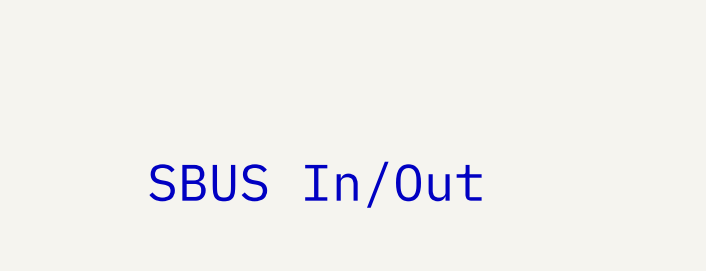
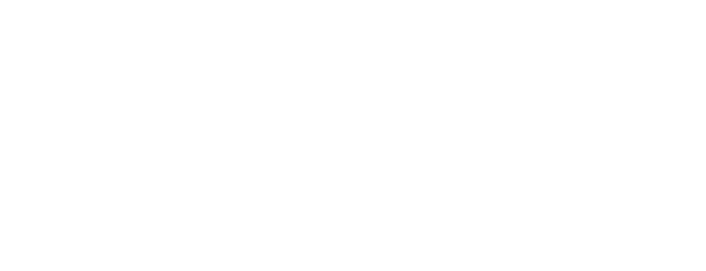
text: SBUS In/Out (315, 184) -> none

